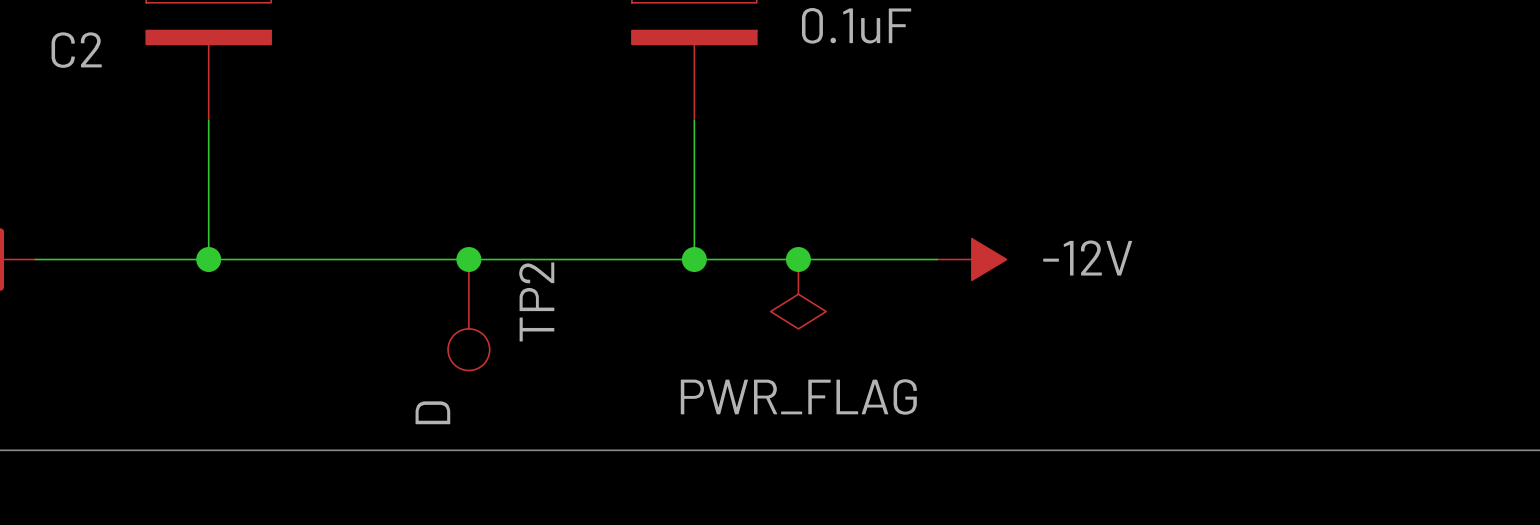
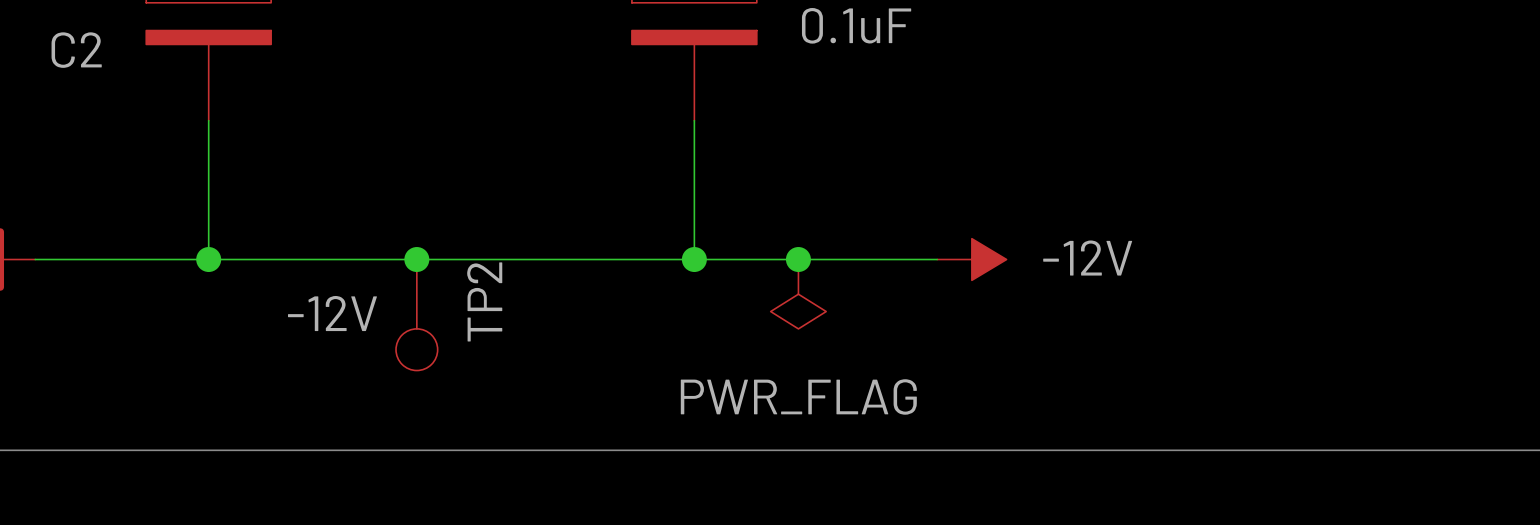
junction position: (468, 259) -> (416, 259)
TP2 position: (468, 315) -> (416, 315)
TP2 value: D (432, 412) -> -12V (332, 313)

